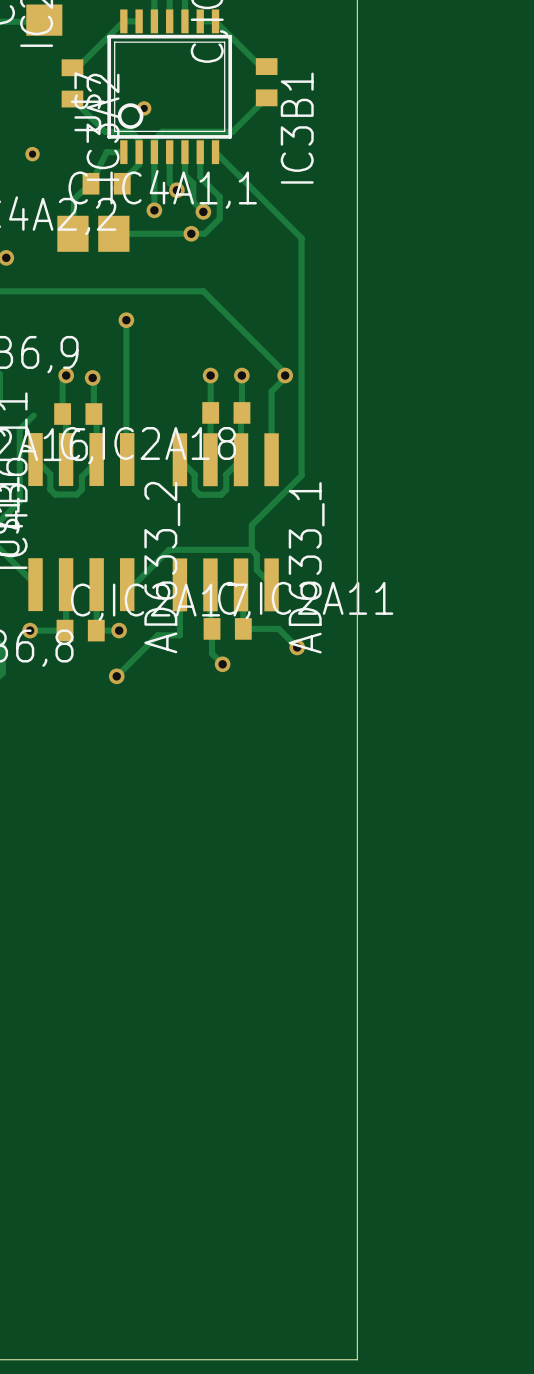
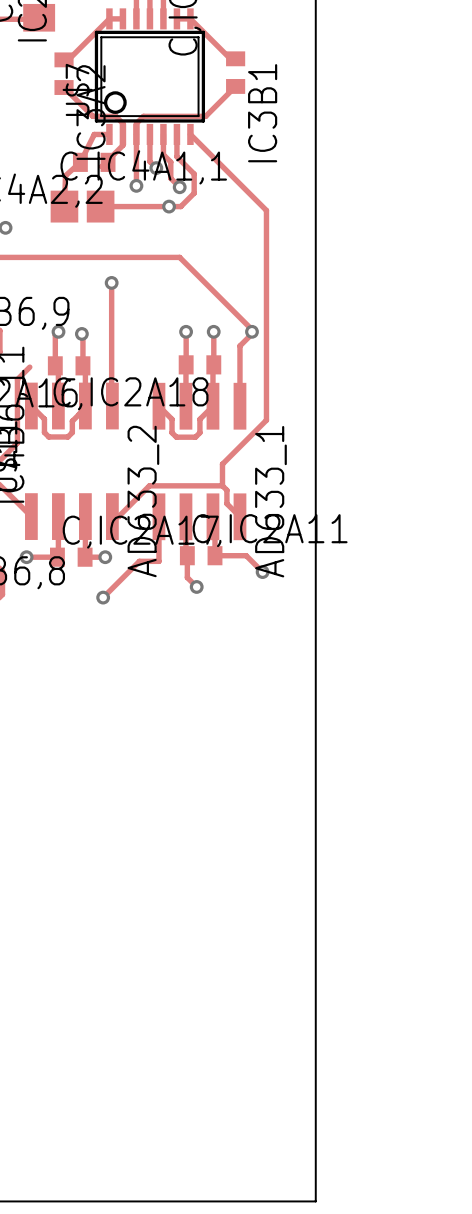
via: (144, 108) -> none
via: (32, 154) -> none

